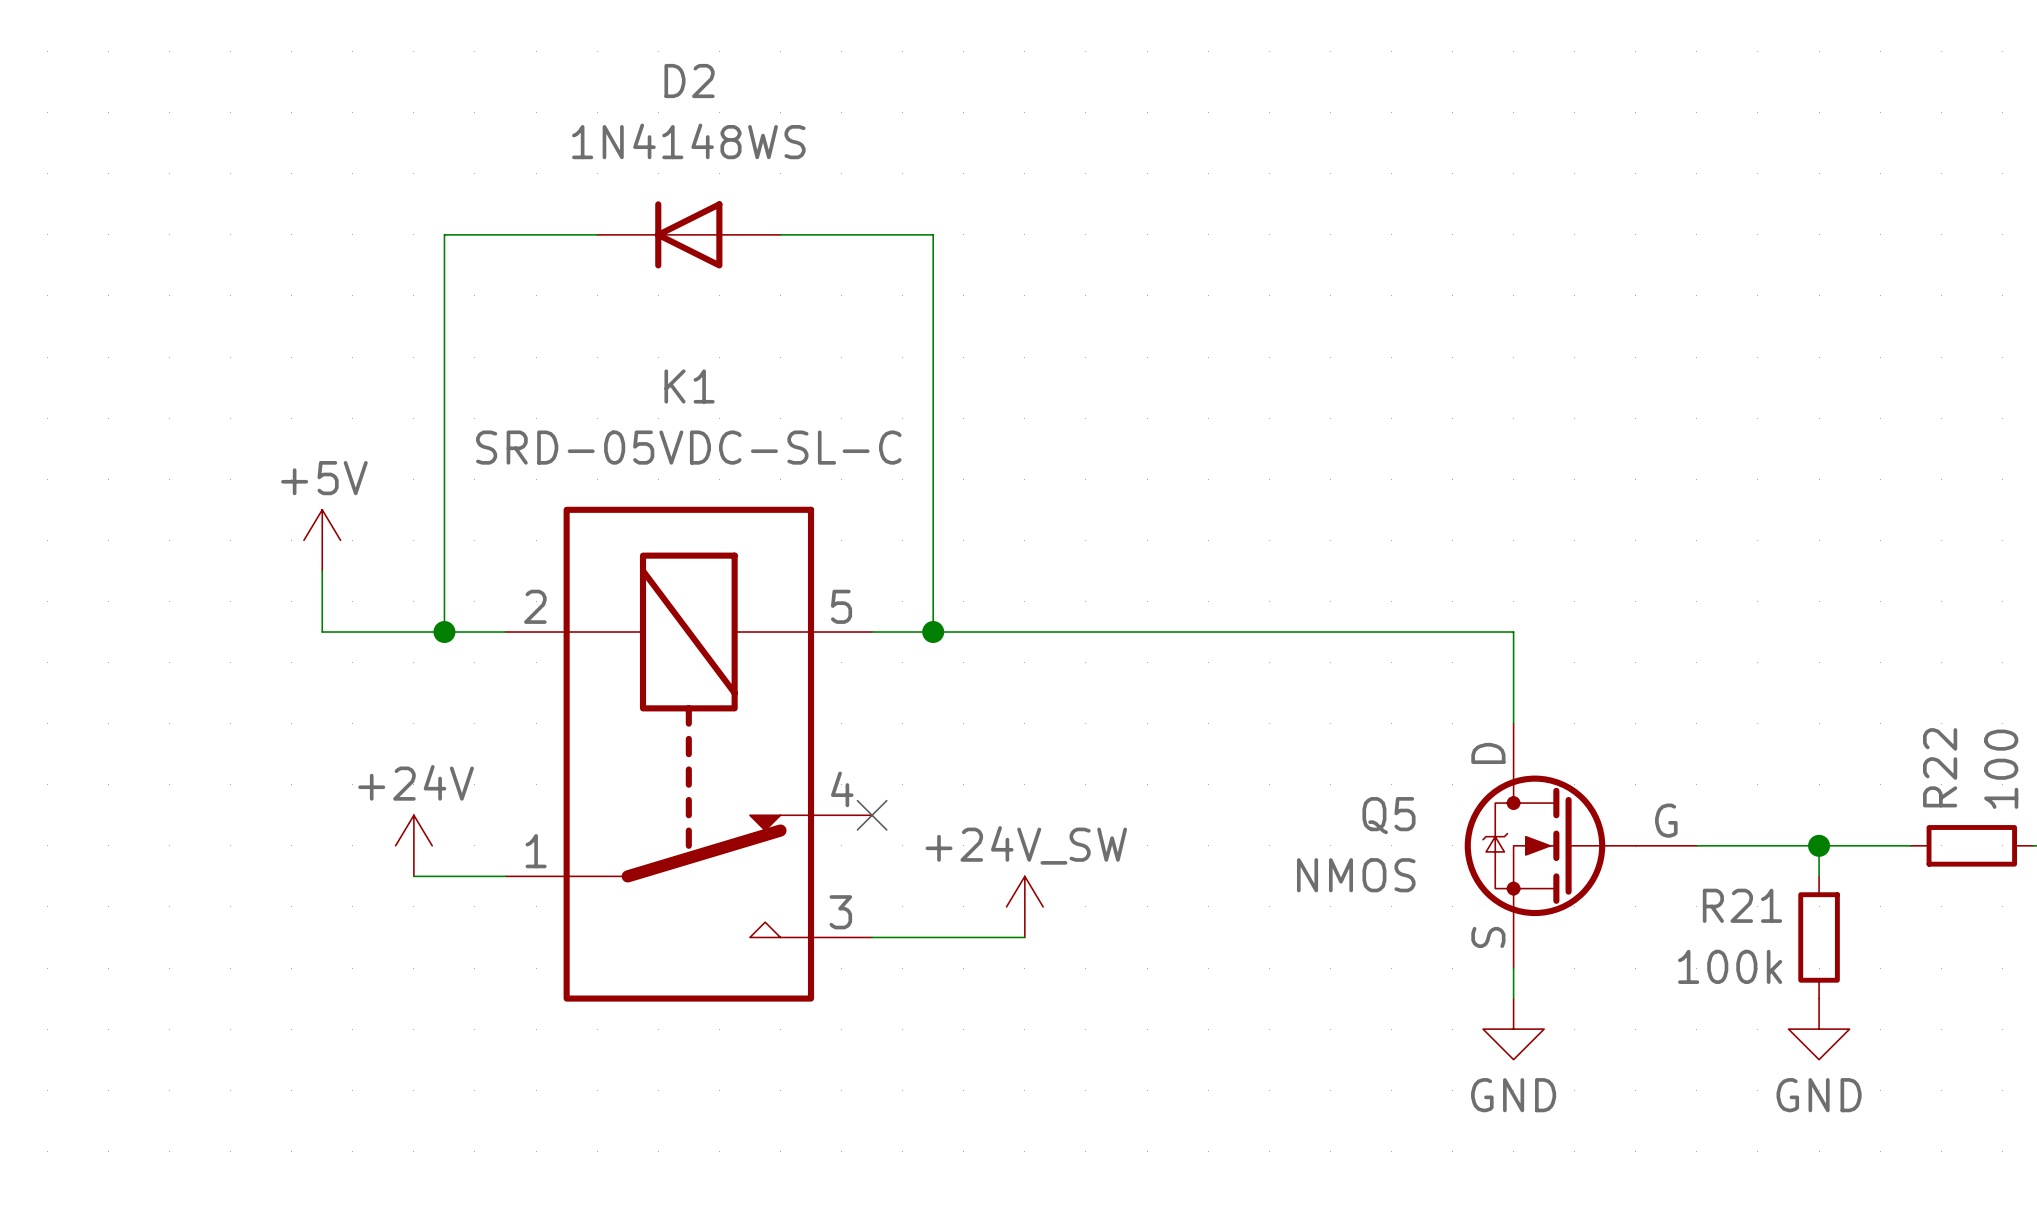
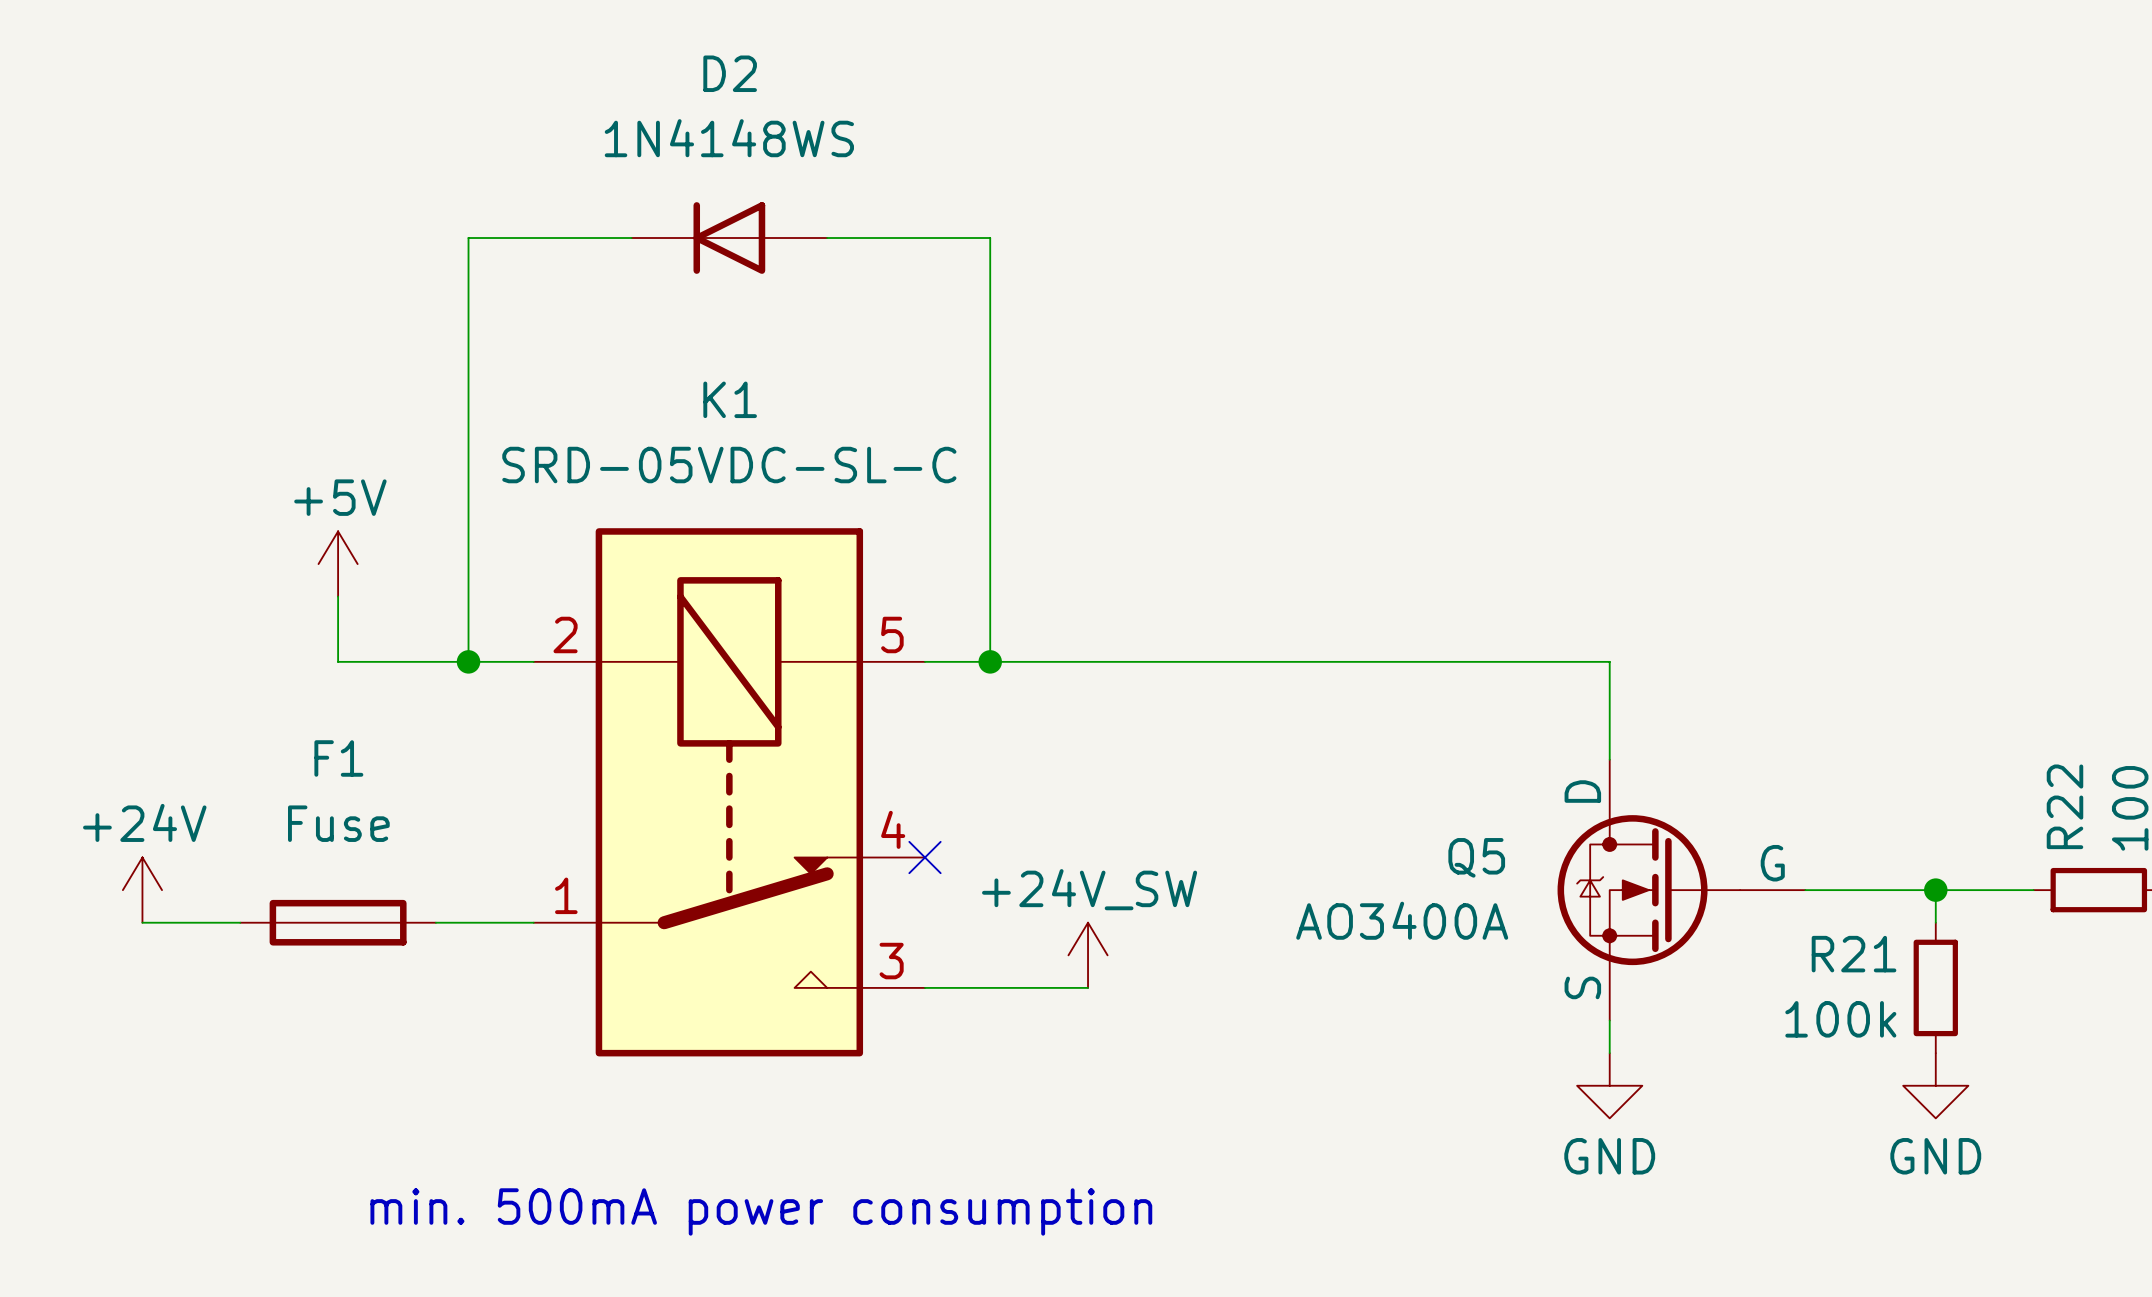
power symbol position: +24V (413, 845) -> +24V (142, 890)
Q5 value: NMOS (1356, 875) -> AO3400A (1402, 920)
wire: none -> (142, 922) (240, 922)
F1: none -> Fuse (338, 922)
text: none -> min. 500mA power consumption (761, 1211)

